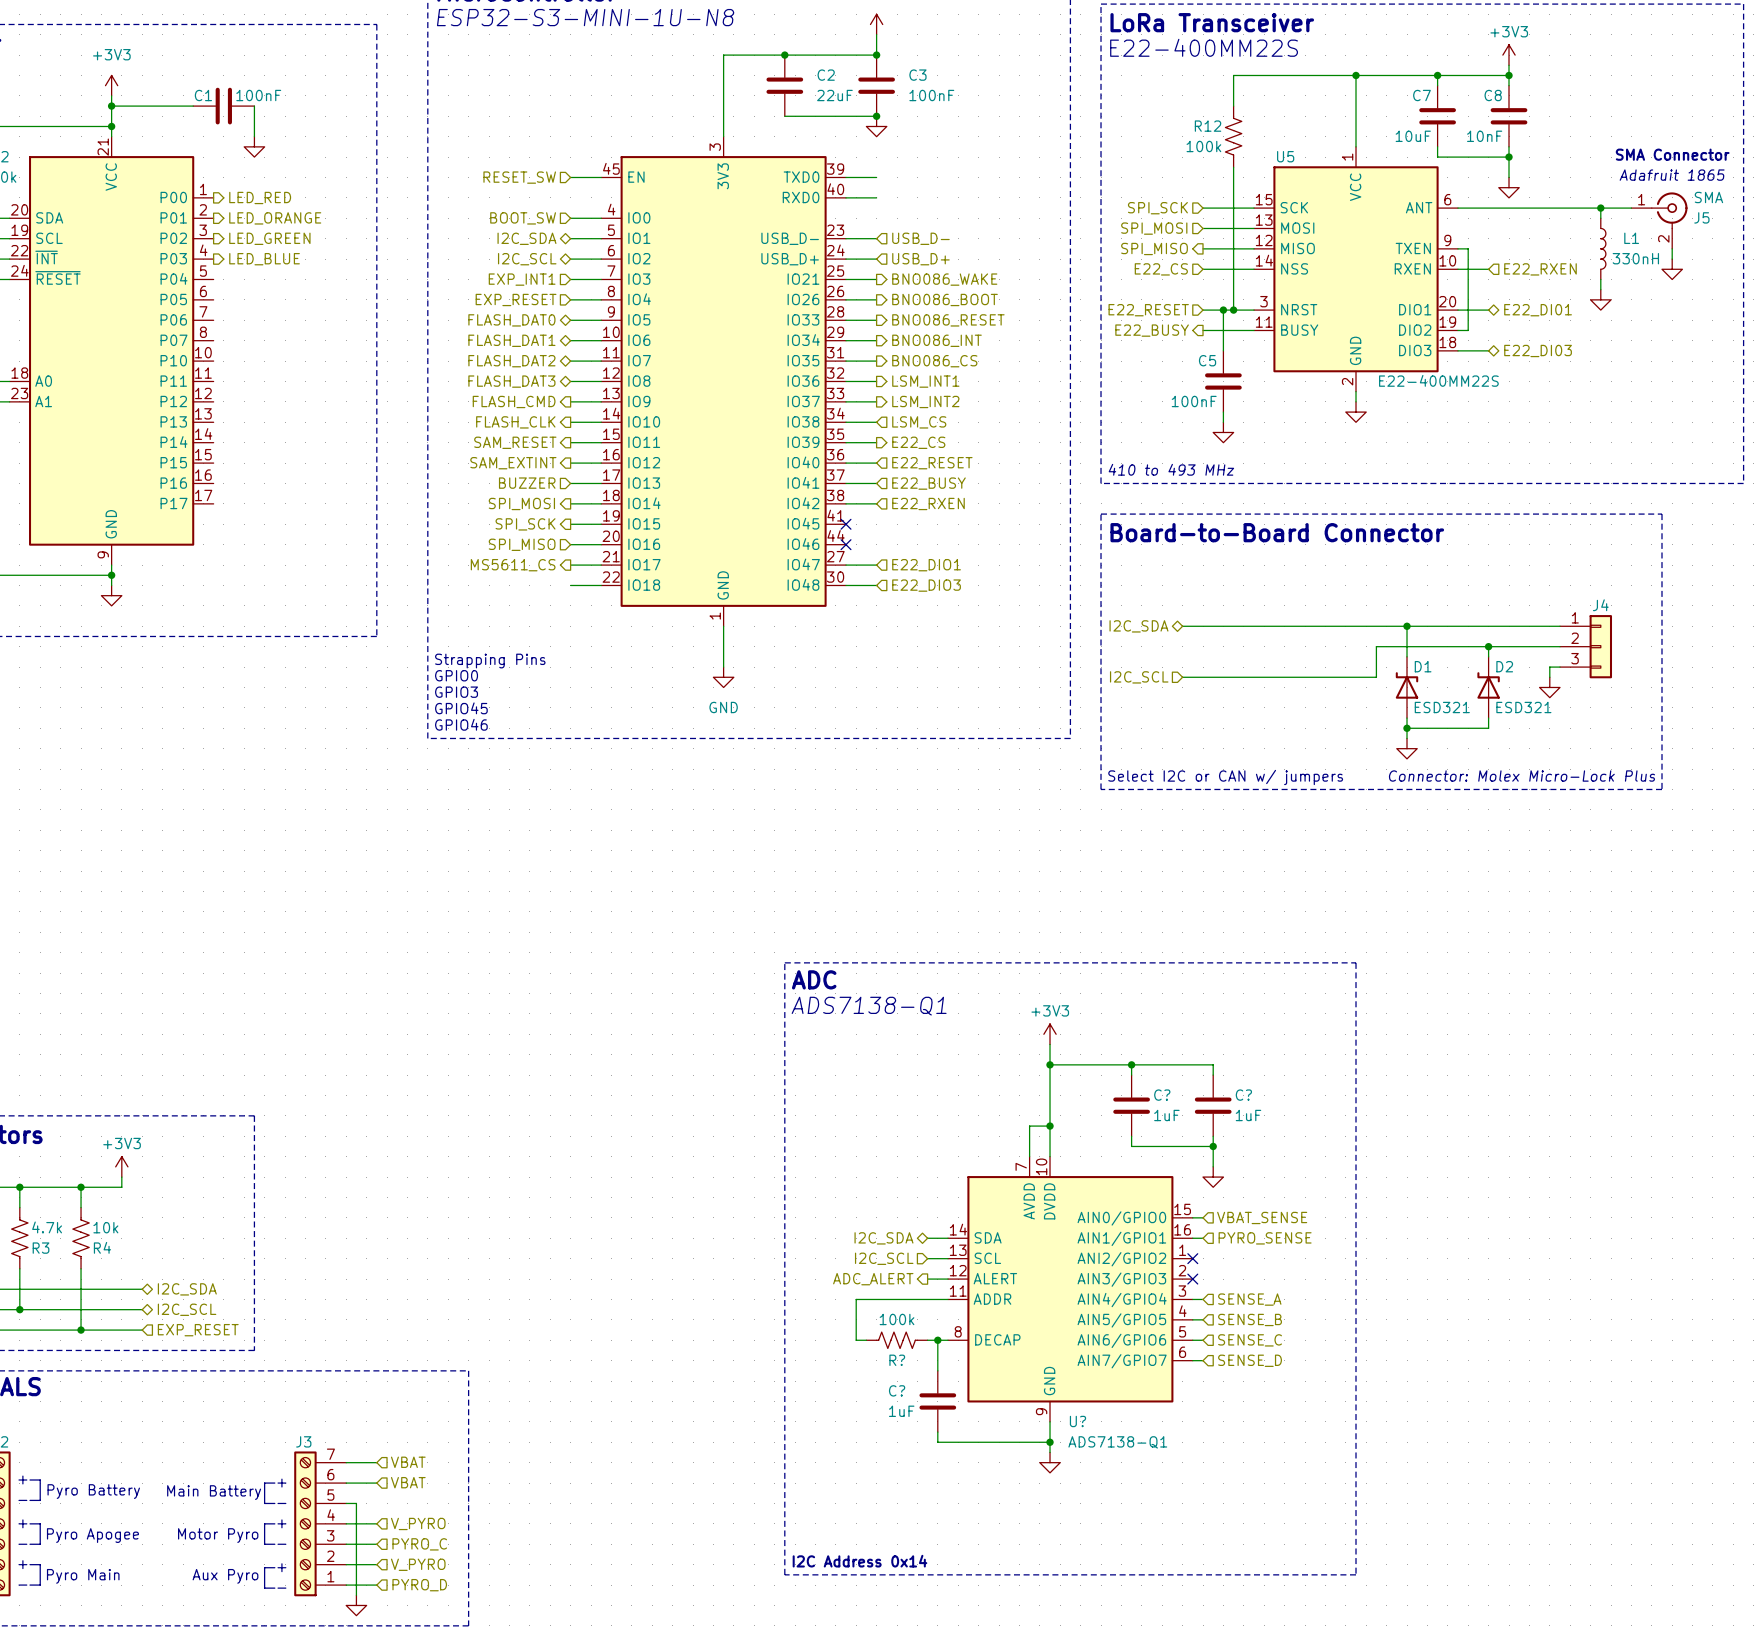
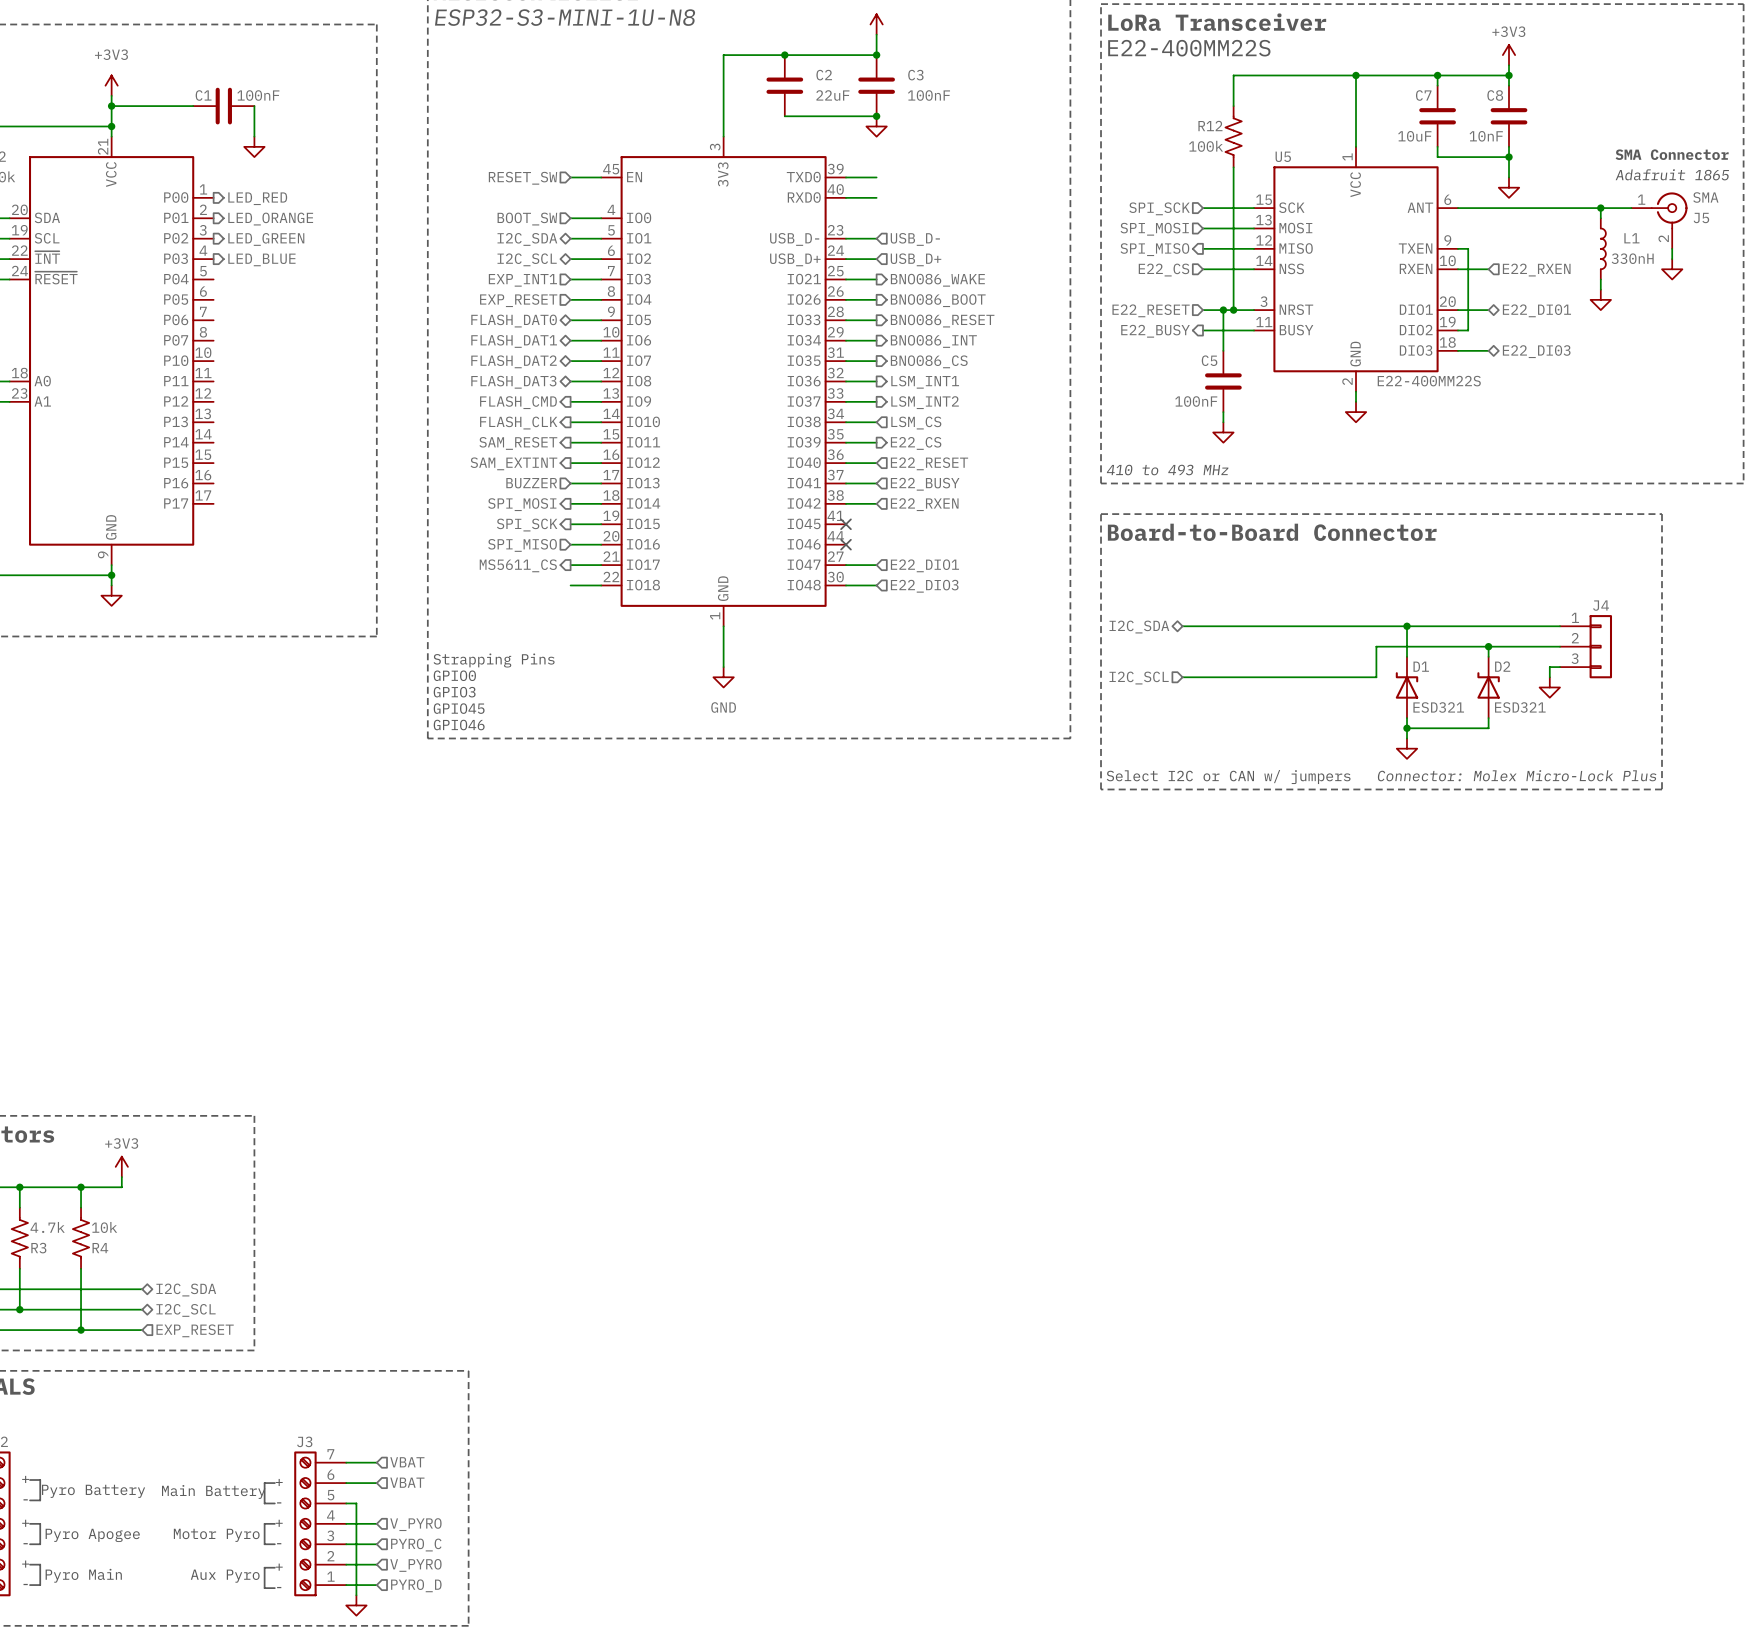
line: (784, 962) (1356, 962) (1356, 1574) (784, 1574) (784, 962) -> none
text: ADC (814, 979) -> none
text: ADS7138-Q1 (869, 1006) -> none
power symbol: +3V3 (1050, 1034) -> none
wire: (1050, 1044) (1050, 1156) -> none
wire: (1050, 1064) (1213, 1064) (1213, 1075) -> none
junction: (1050, 1064) -> none
wire: (1131, 1064) (1131, 1075) -> none
junction: (1131, 1064) -> none
C?: 1uF (1131, 1105) -> none
C?: 1uF (1213, 1105) -> none
wire: (1050, 1126) (1029, 1126) (1029, 1156) -> none
junction: (1050, 1126) -> none
wire: (1131, 1136) (1131, 1146) (1213, 1146) -> none
wire: (1213, 1136) (1213, 1166) -> none
junction: (1213, 1146) -> none
power symbol: (1213, 1177) -> none
wire: (1192, 1217) (1203, 1217) -> none
hierarchical label: VBAT_SENSE (1262, 1217) -> none
hierarchical label: I2C_SDA (883, 1238) -> none
wire: (927, 1238) (948, 1238) -> none
wire: (1192, 1238) (1203, 1238) -> none
hierarchical label: PYRO_SENSE (1265, 1238) -> none
hierarchical label: I2C_SCL (884, 1258) -> none
wire: (927, 1258) (948, 1258) -> none
no-connect mark: (1192, 1258) -> none
hierarchical label: ADC_ALERT (873, 1279) -> none
wire: (927, 1279) (948, 1279) -> none
no-connect mark: (1192, 1279) -> none
U?: ADS7138-Q1 (1070, 1289) -> none
wire: (948, 1299) (856, 1299) (856, 1340) (866, 1340) -> none
wire: (1192, 1299) (1203, 1299) -> none
hierarchical label: SENSE_A (1249, 1299) -> none
wire: (1192, 1319) (1203, 1319) -> none
hierarchical label: SENSE_B (1250, 1319) -> none
R?: 100k (897, 1340) -> none
wire: (927, 1340) (948, 1340) -> none
wire: (937, 1340) (937, 1370) -> none
junction: (937, 1340) -> none
wire: (1192, 1340) (1203, 1340) -> none
hierarchical label: SENSE_C (1250, 1340) -> none
wire: (1192, 1360) (1203, 1360) -> none
hierarchical label: SENSE_D (1250, 1360) -> none
C?: 1uF (937, 1401) -> none
wire: (1050, 1421) (1050, 1452) -> none
wire: (937, 1432) (937, 1442) (1050, 1442) -> none
junction: (1050, 1442) -> none
power symbol: (1050, 1462) -> none
text: I2C Address 0x14 (859, 1561) -> none

